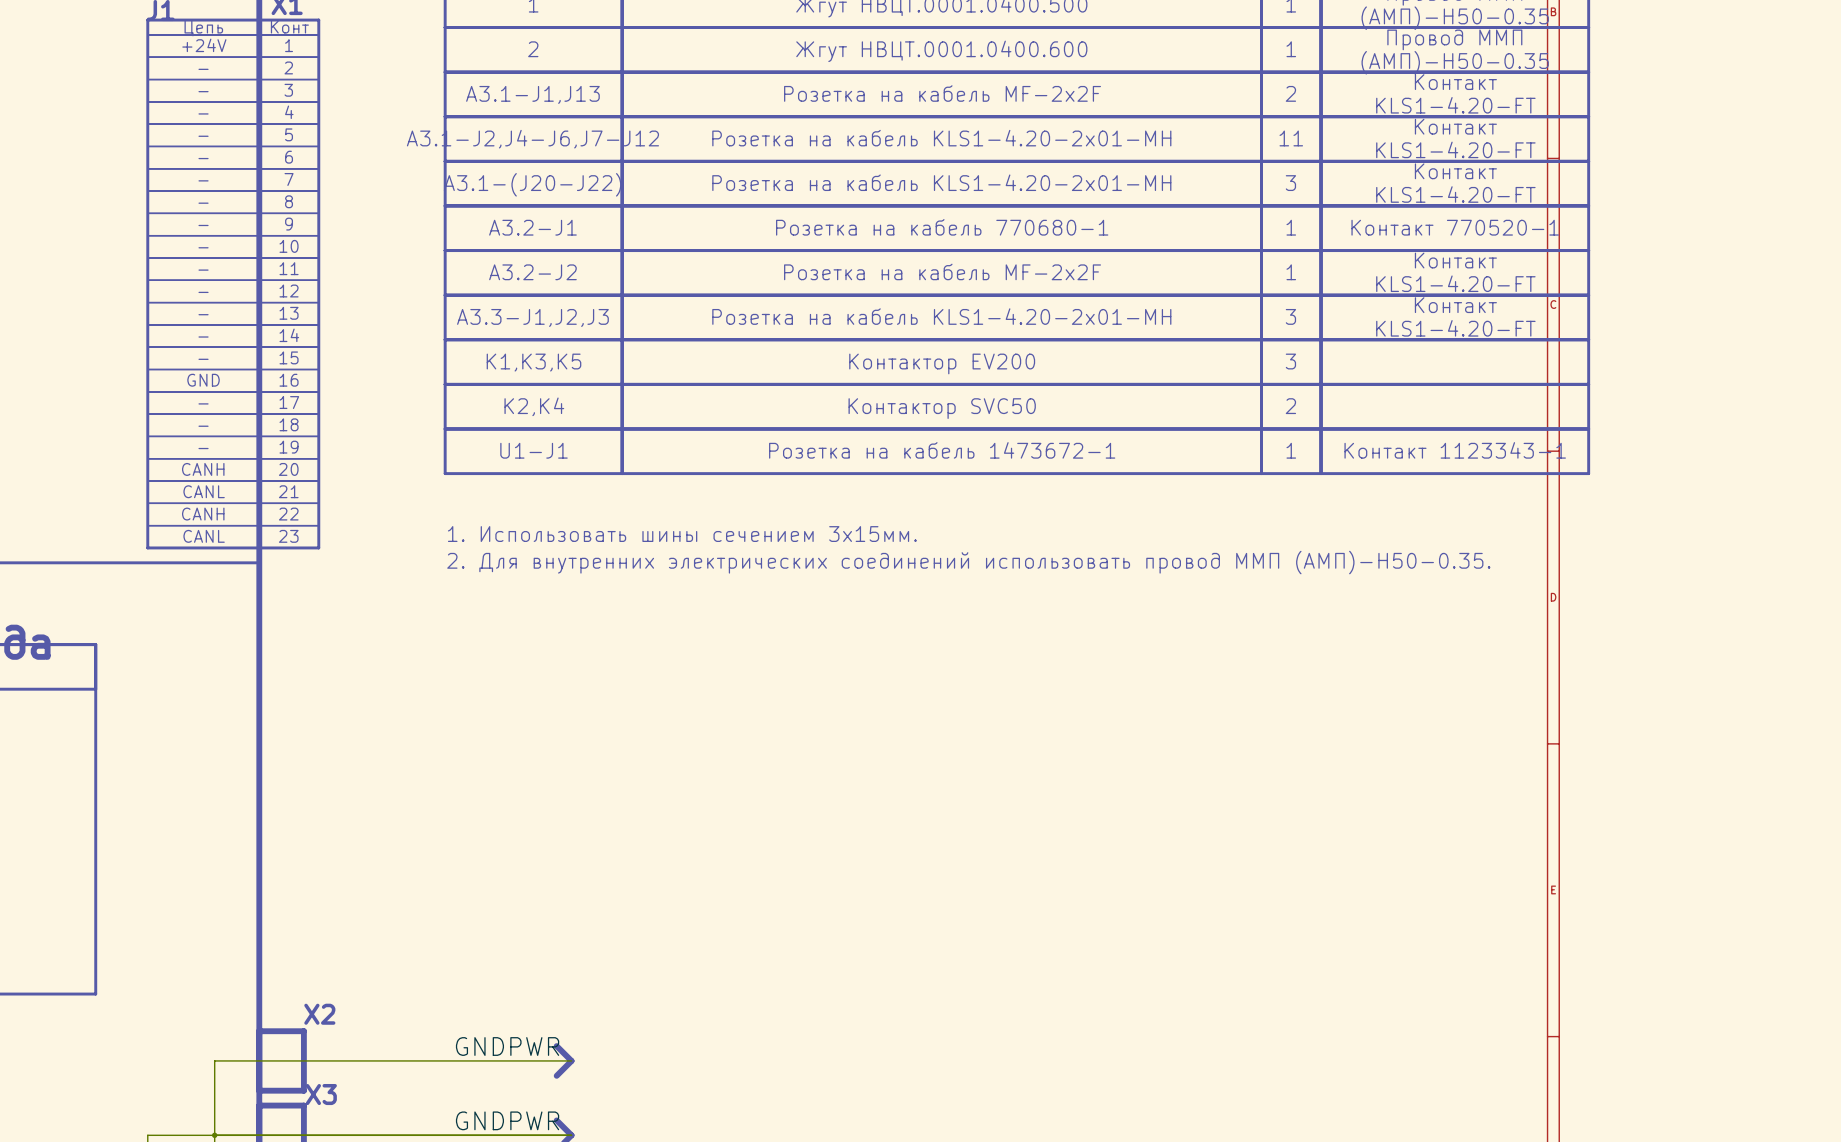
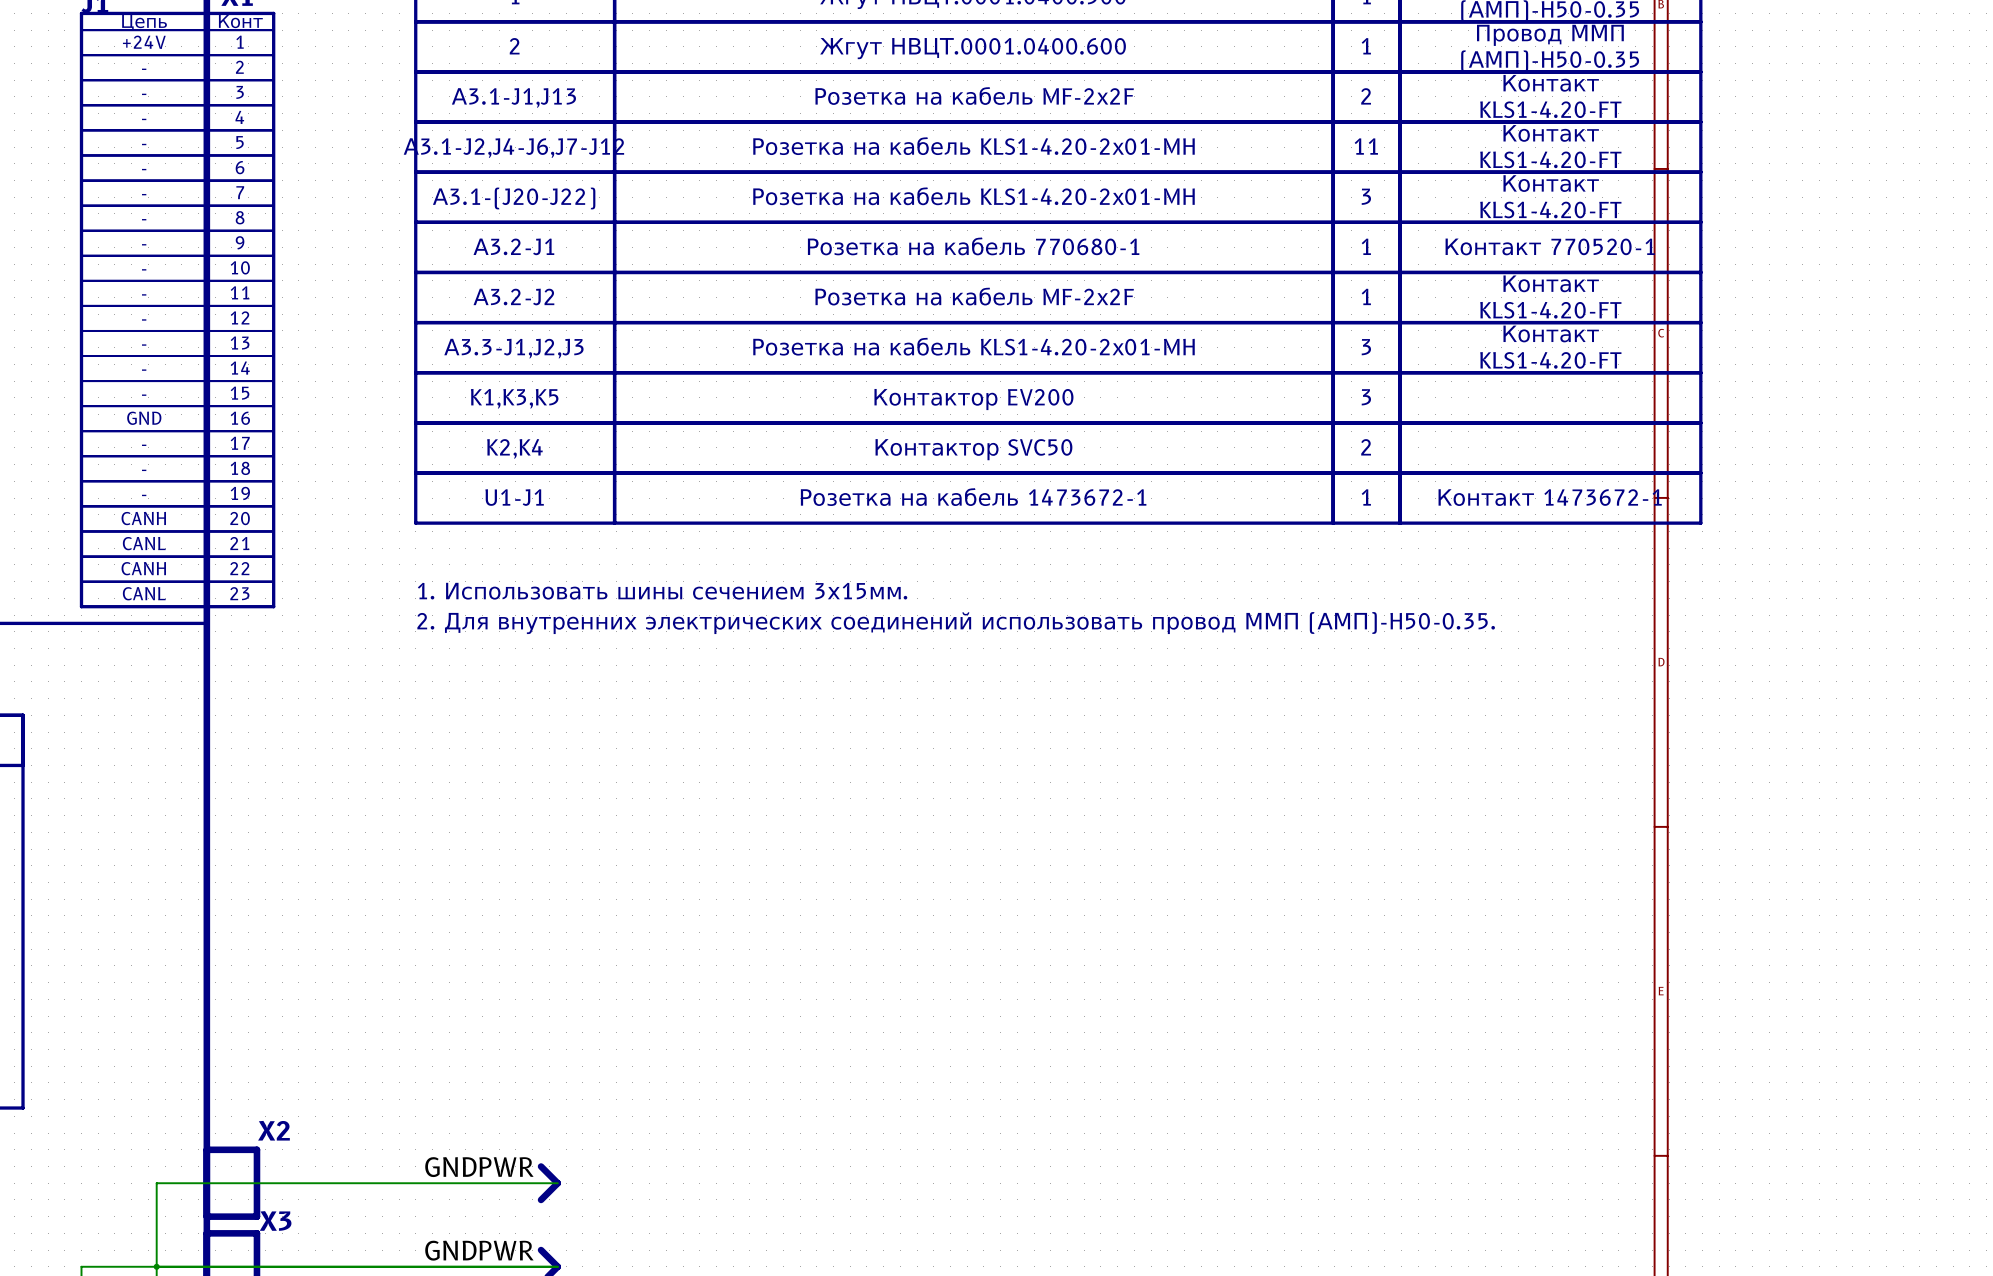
text: Контакт 1123343-1 (1455, 450) -> Контакт 1473672-1 (1550, 497)

